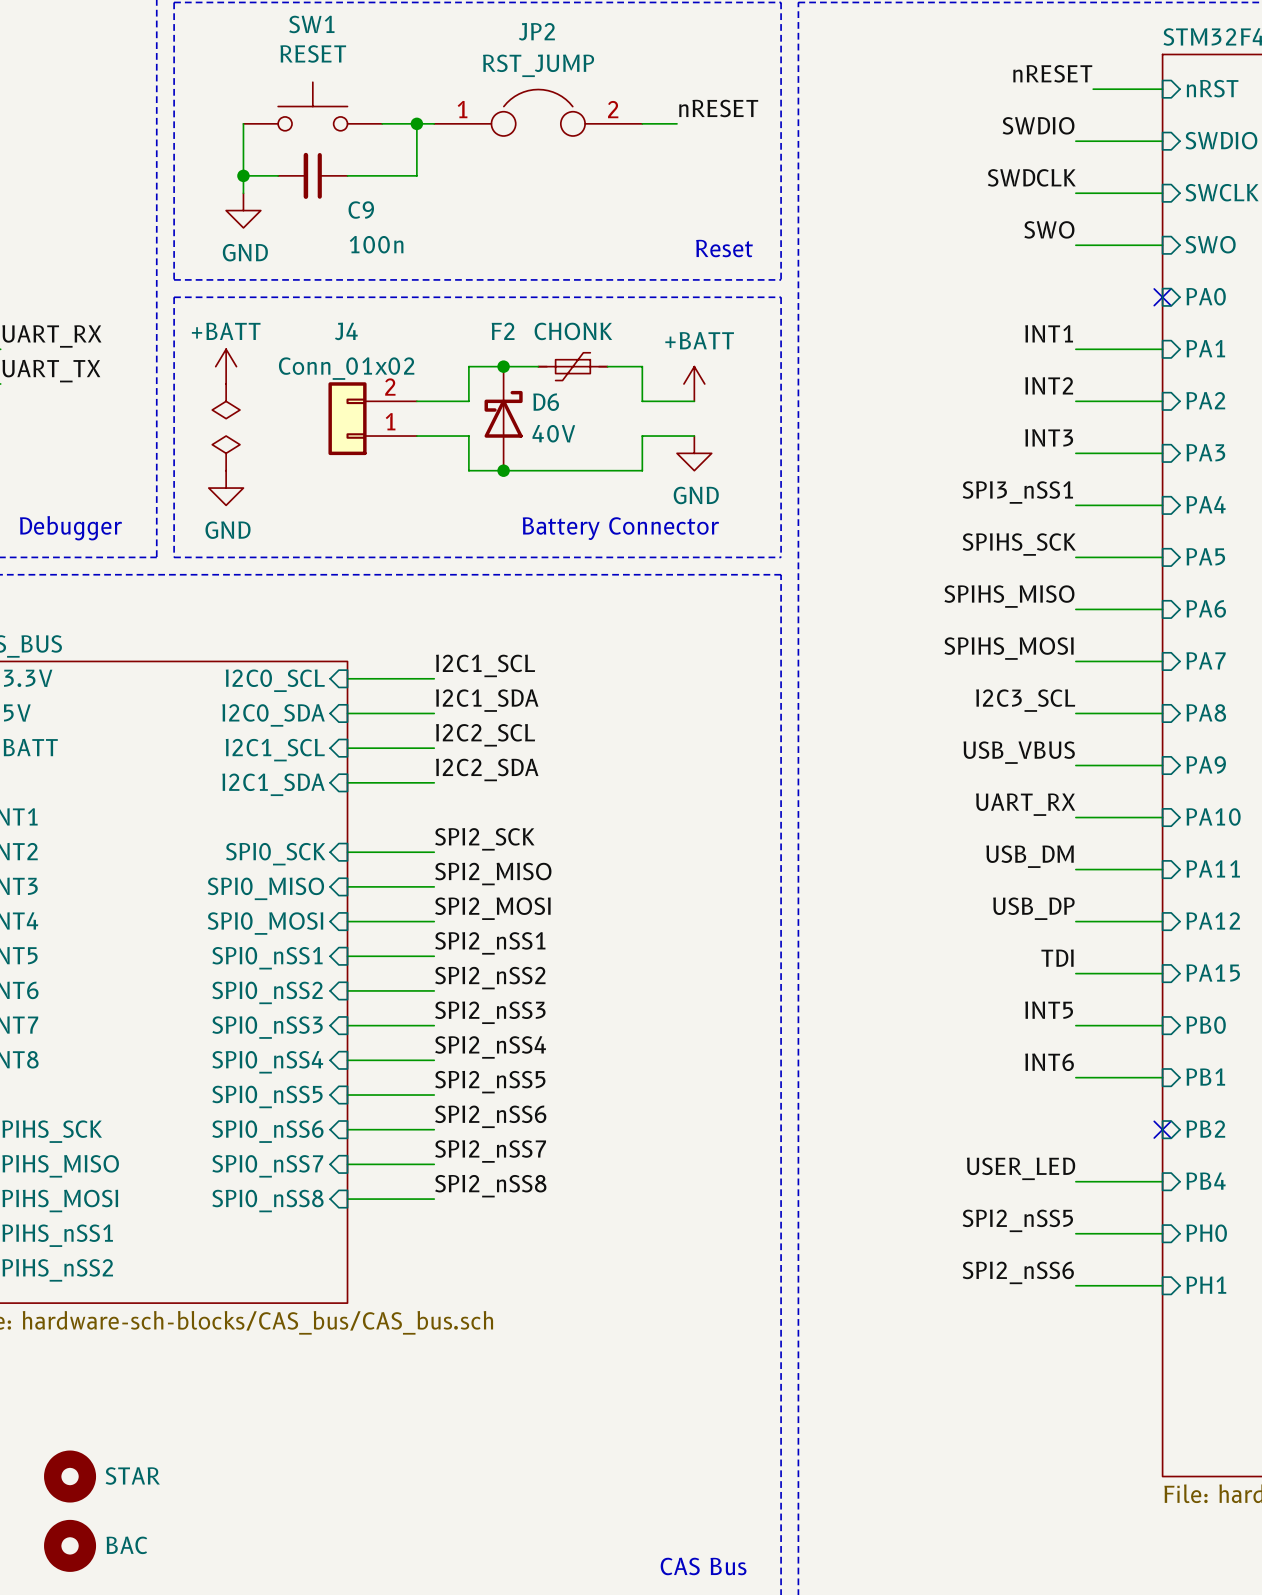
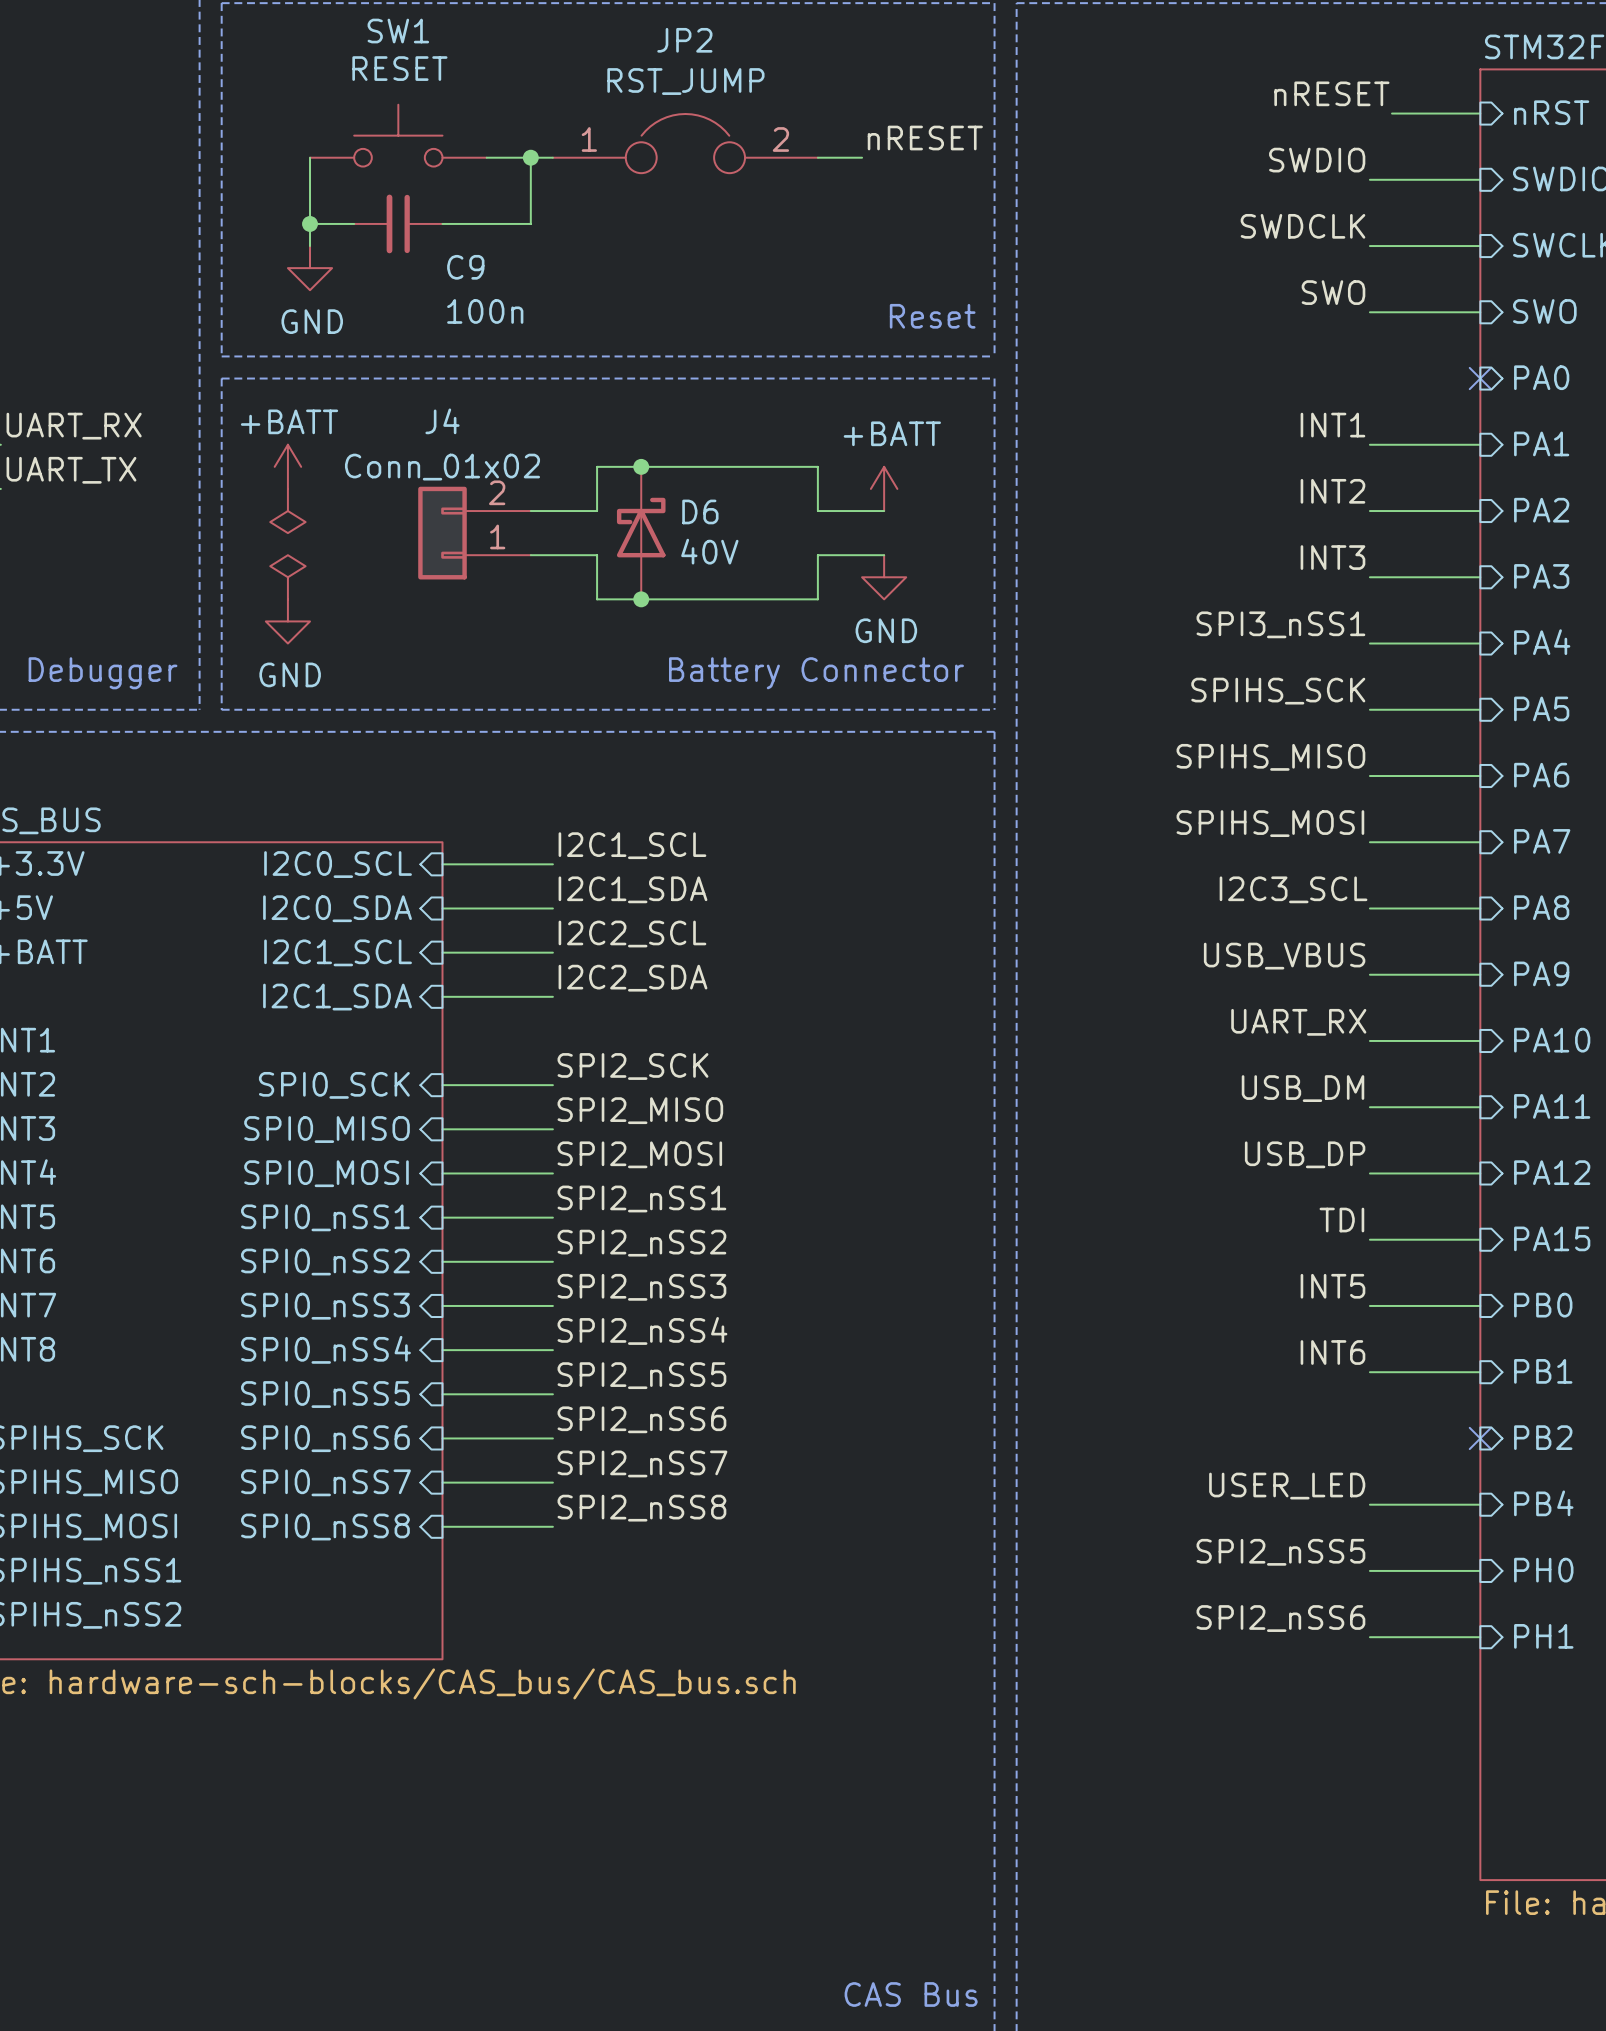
F2: CHONK (572, 366) -> none
part: STAR (70, 1476) -> none
part: BAC (70, 1545) -> none

